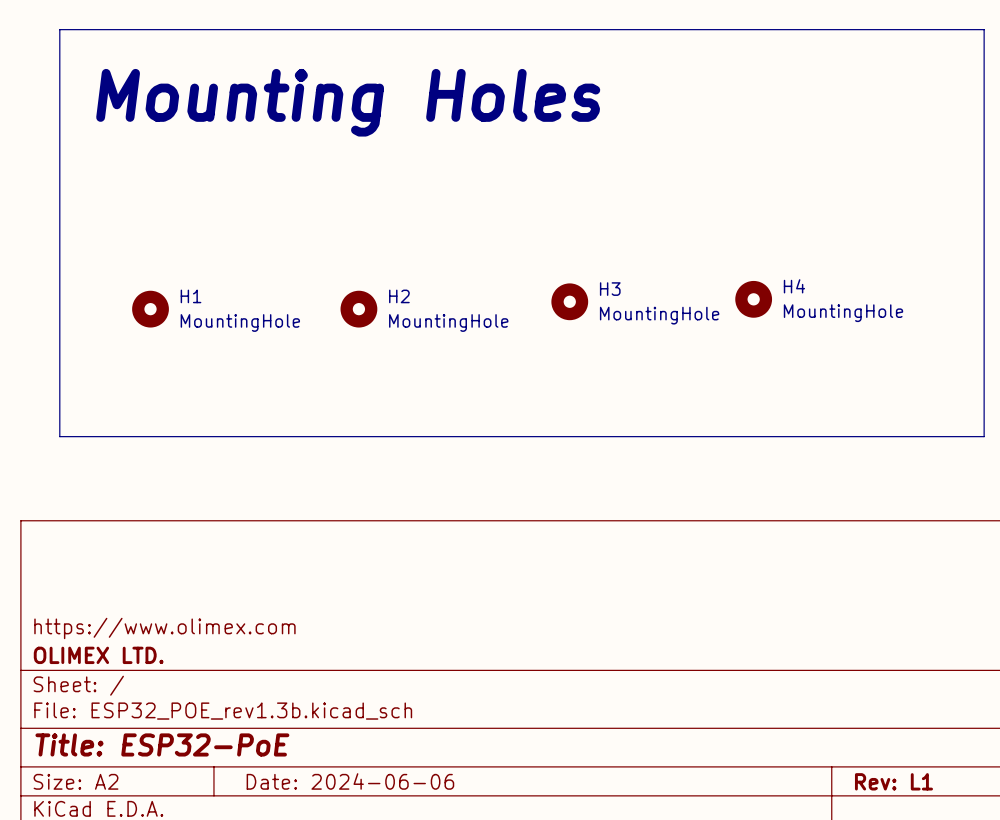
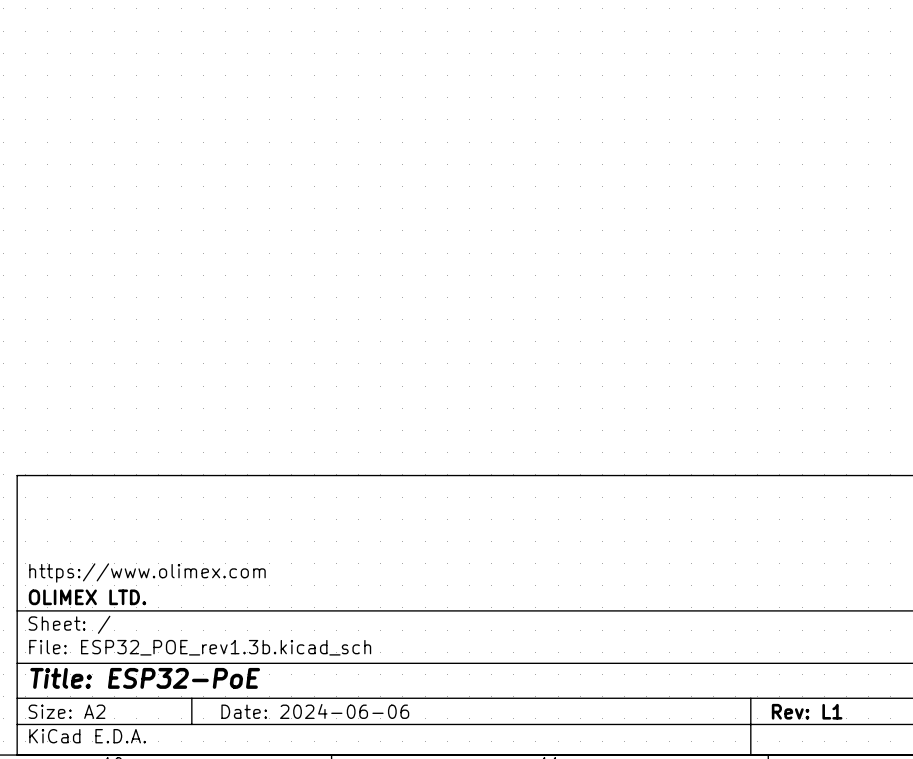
line: (59, 29) (984, 29) (984, 436) (59, 436) (59, 29) -> none
text: Mounting Holes (348, 102) -> none
H4: MountingHole (753, 299) -> none
H3: MountingHole (569, 301) -> none
H1: MountingHole (150, 309) -> none
H2: MountingHole (358, 309) -> none

